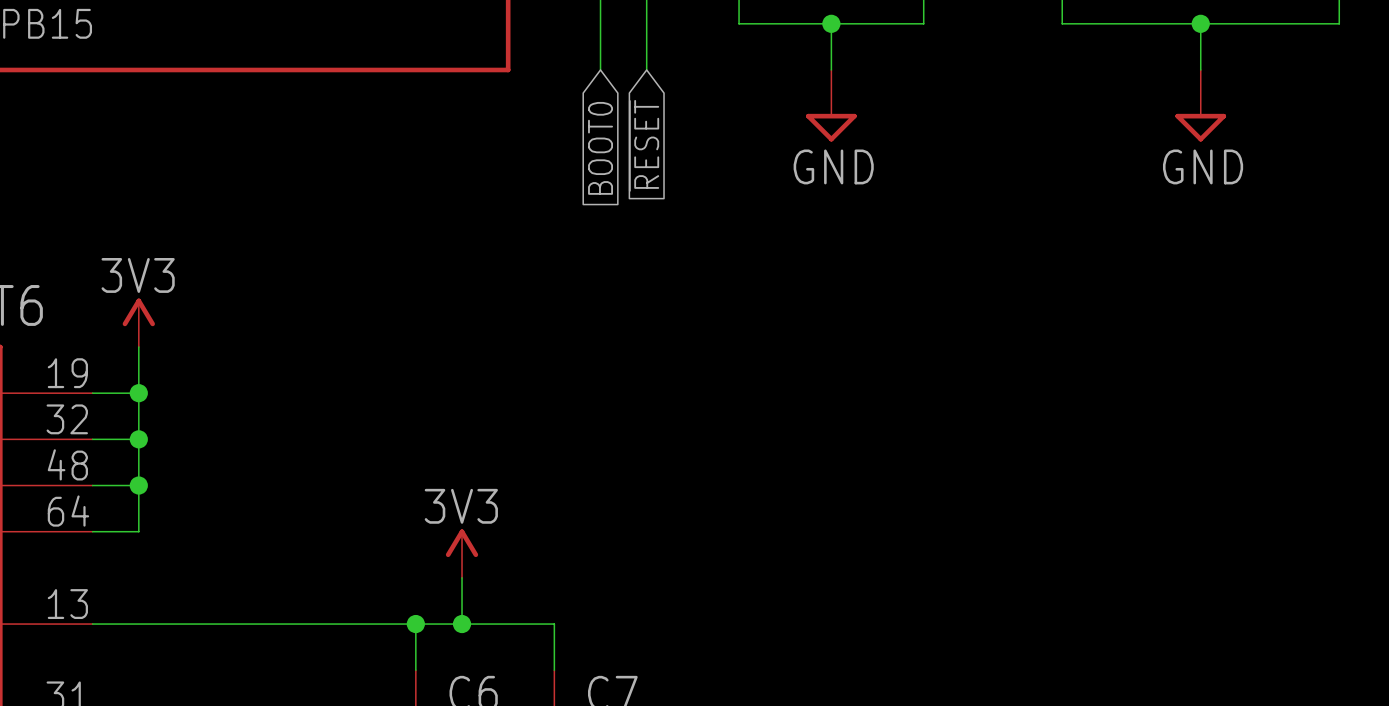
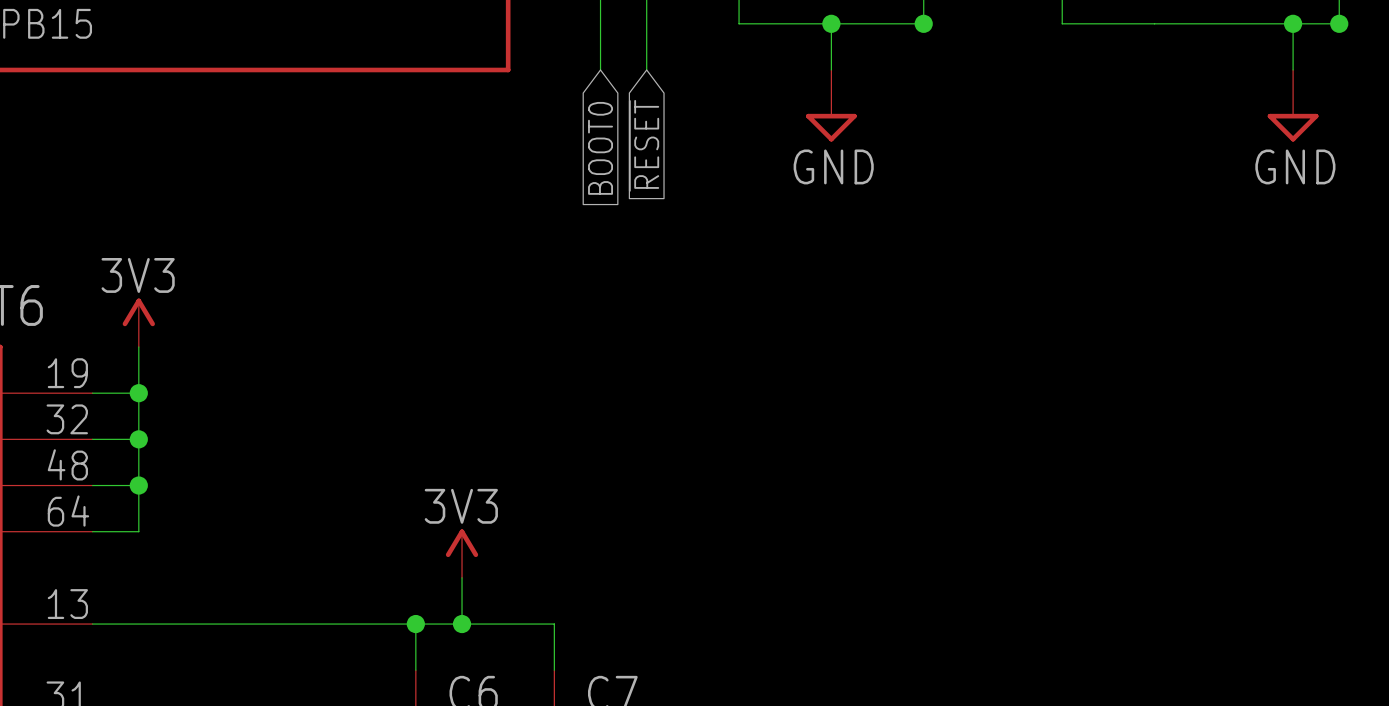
junction: none -> (923, 23)
wire: (1200, 23) (1200, 69) -> (1293, 23) (1293, 69)
junction: (1200, 23) -> none
junction: none -> (1293, 23)
junction: none -> (1339, 23)
power symbol position: GND (1200, 105) -> GND (1293, 105)

